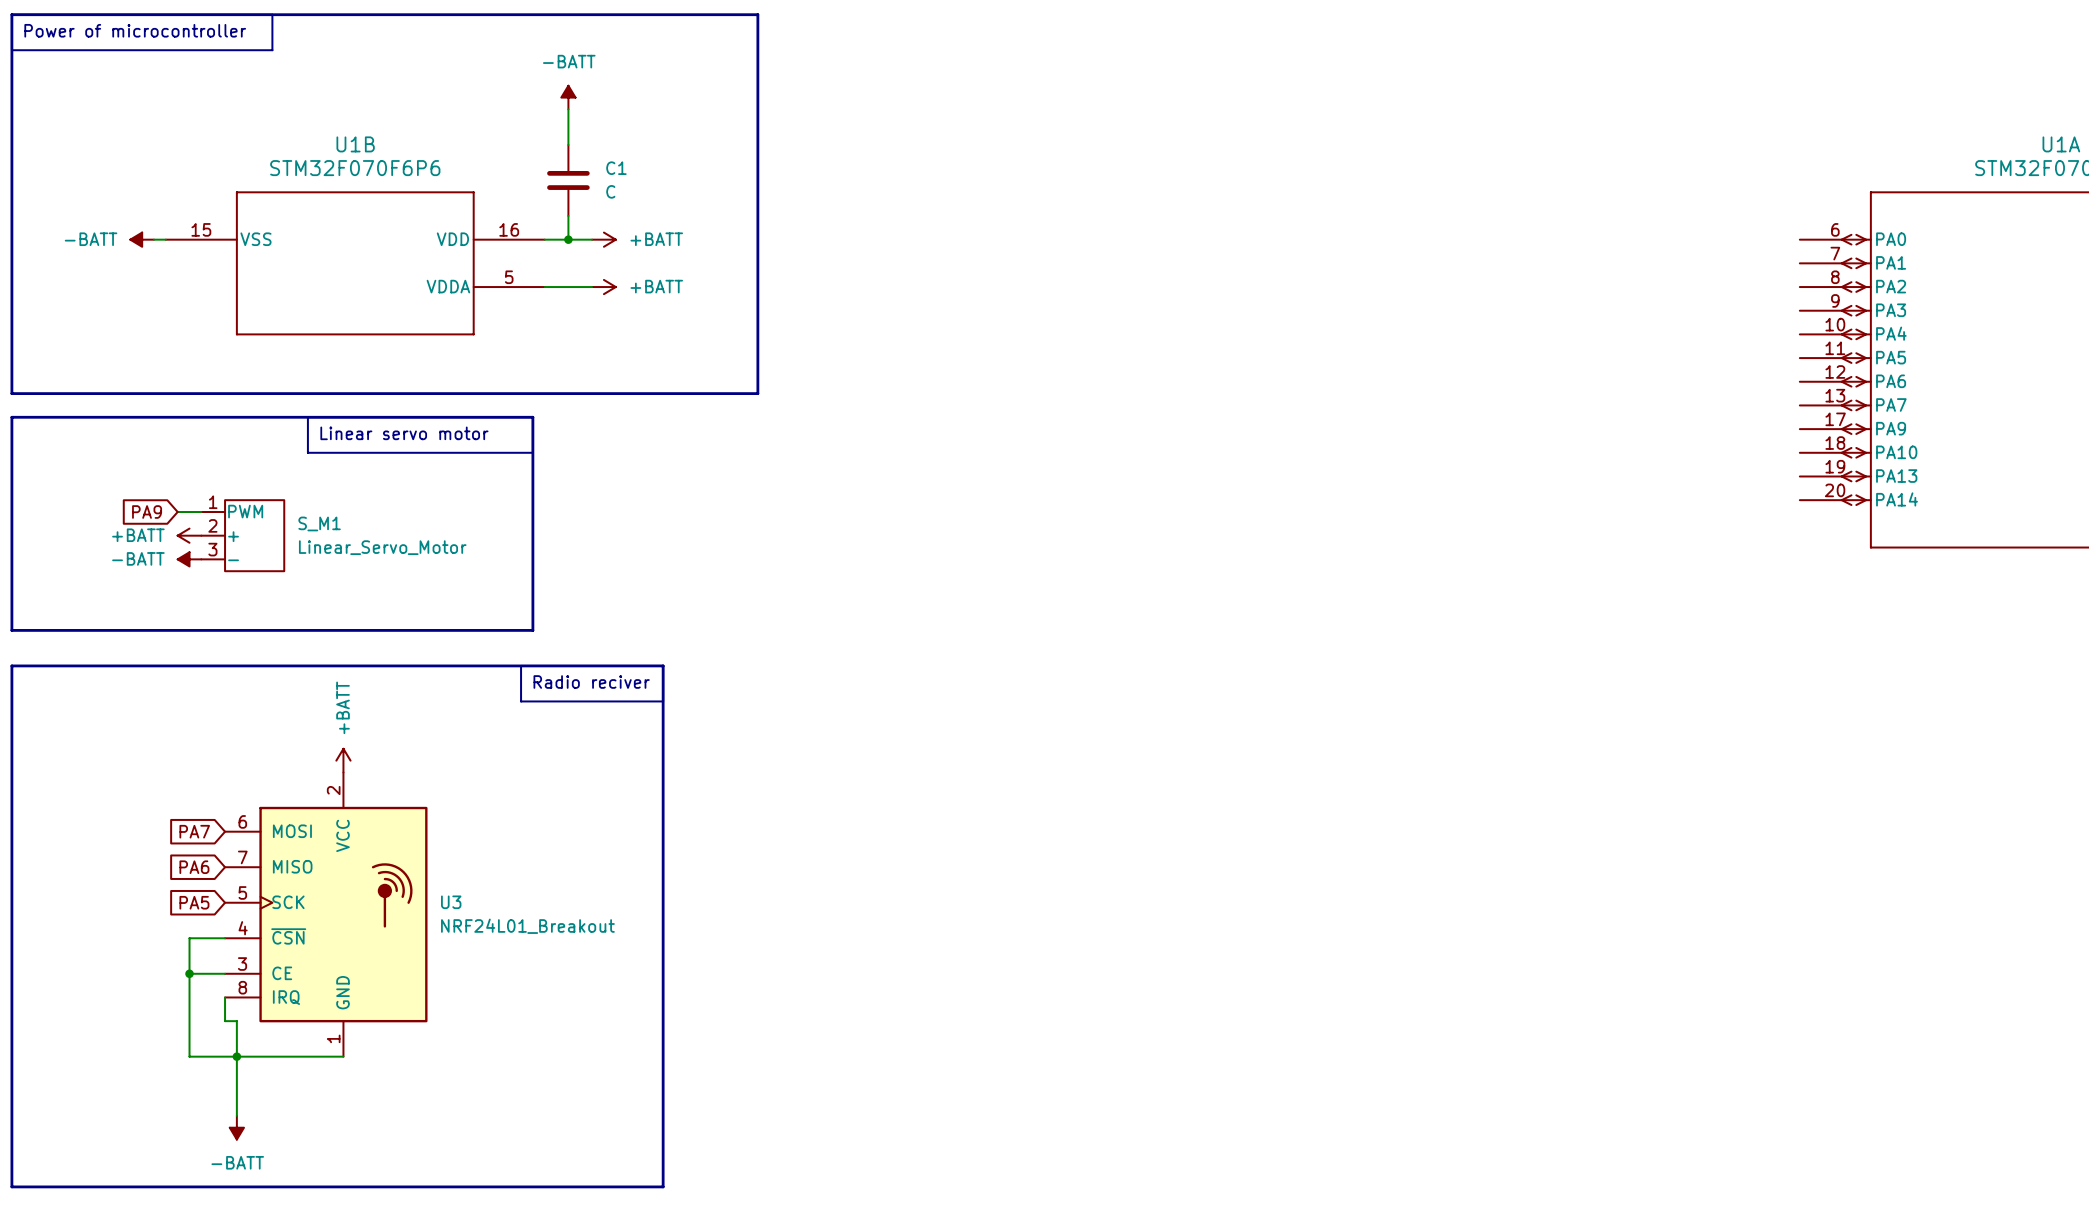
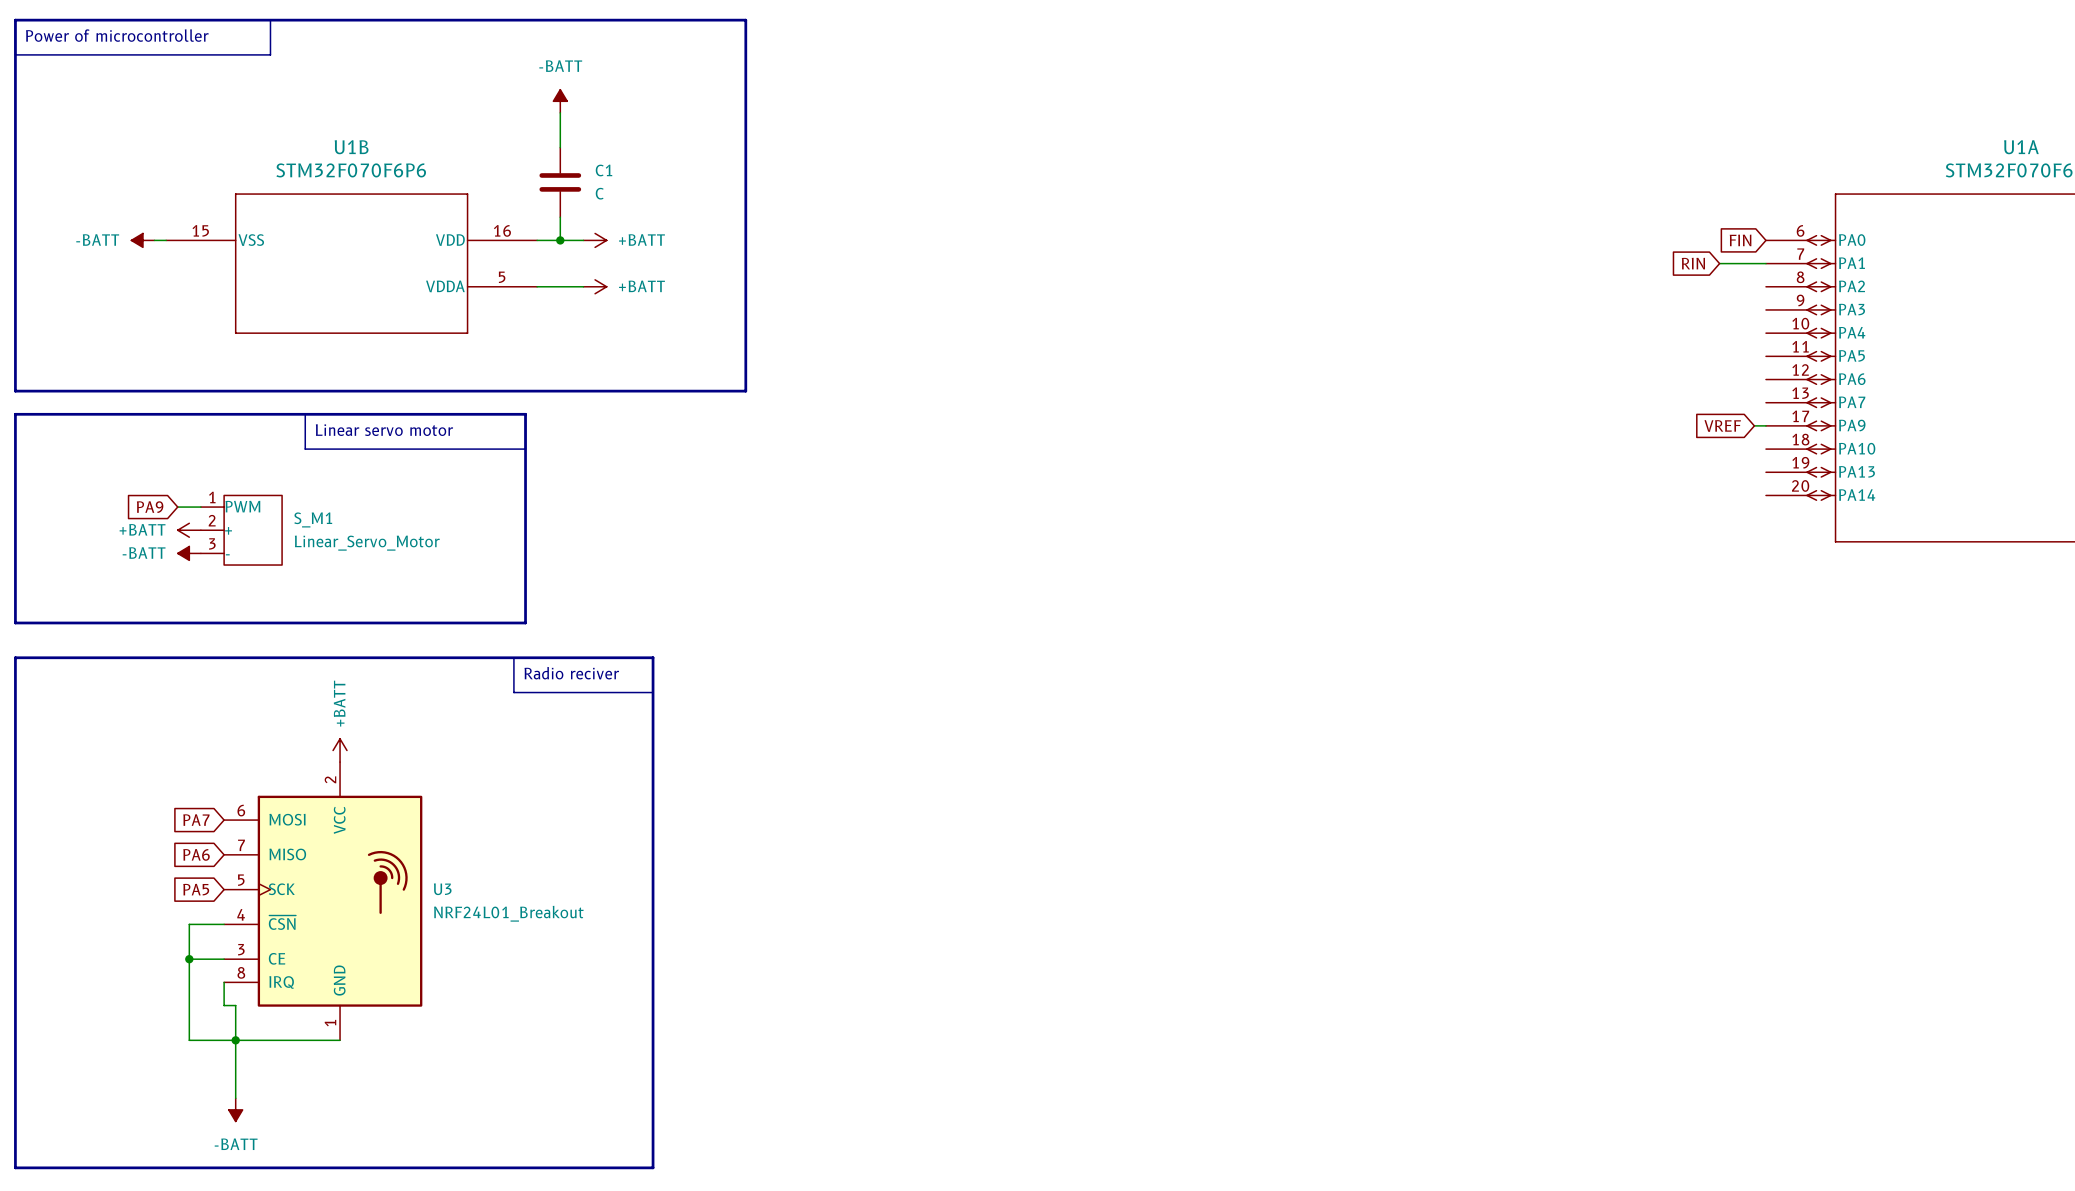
global label: none -> FIN (1740, 240)
global label: none -> RIN (1693, 263)
wire: none -> (1719, 263) (1765, 263)
global label: none -> VREF (1722, 425)
wire: none -> (1754, 425) (1765, 425)

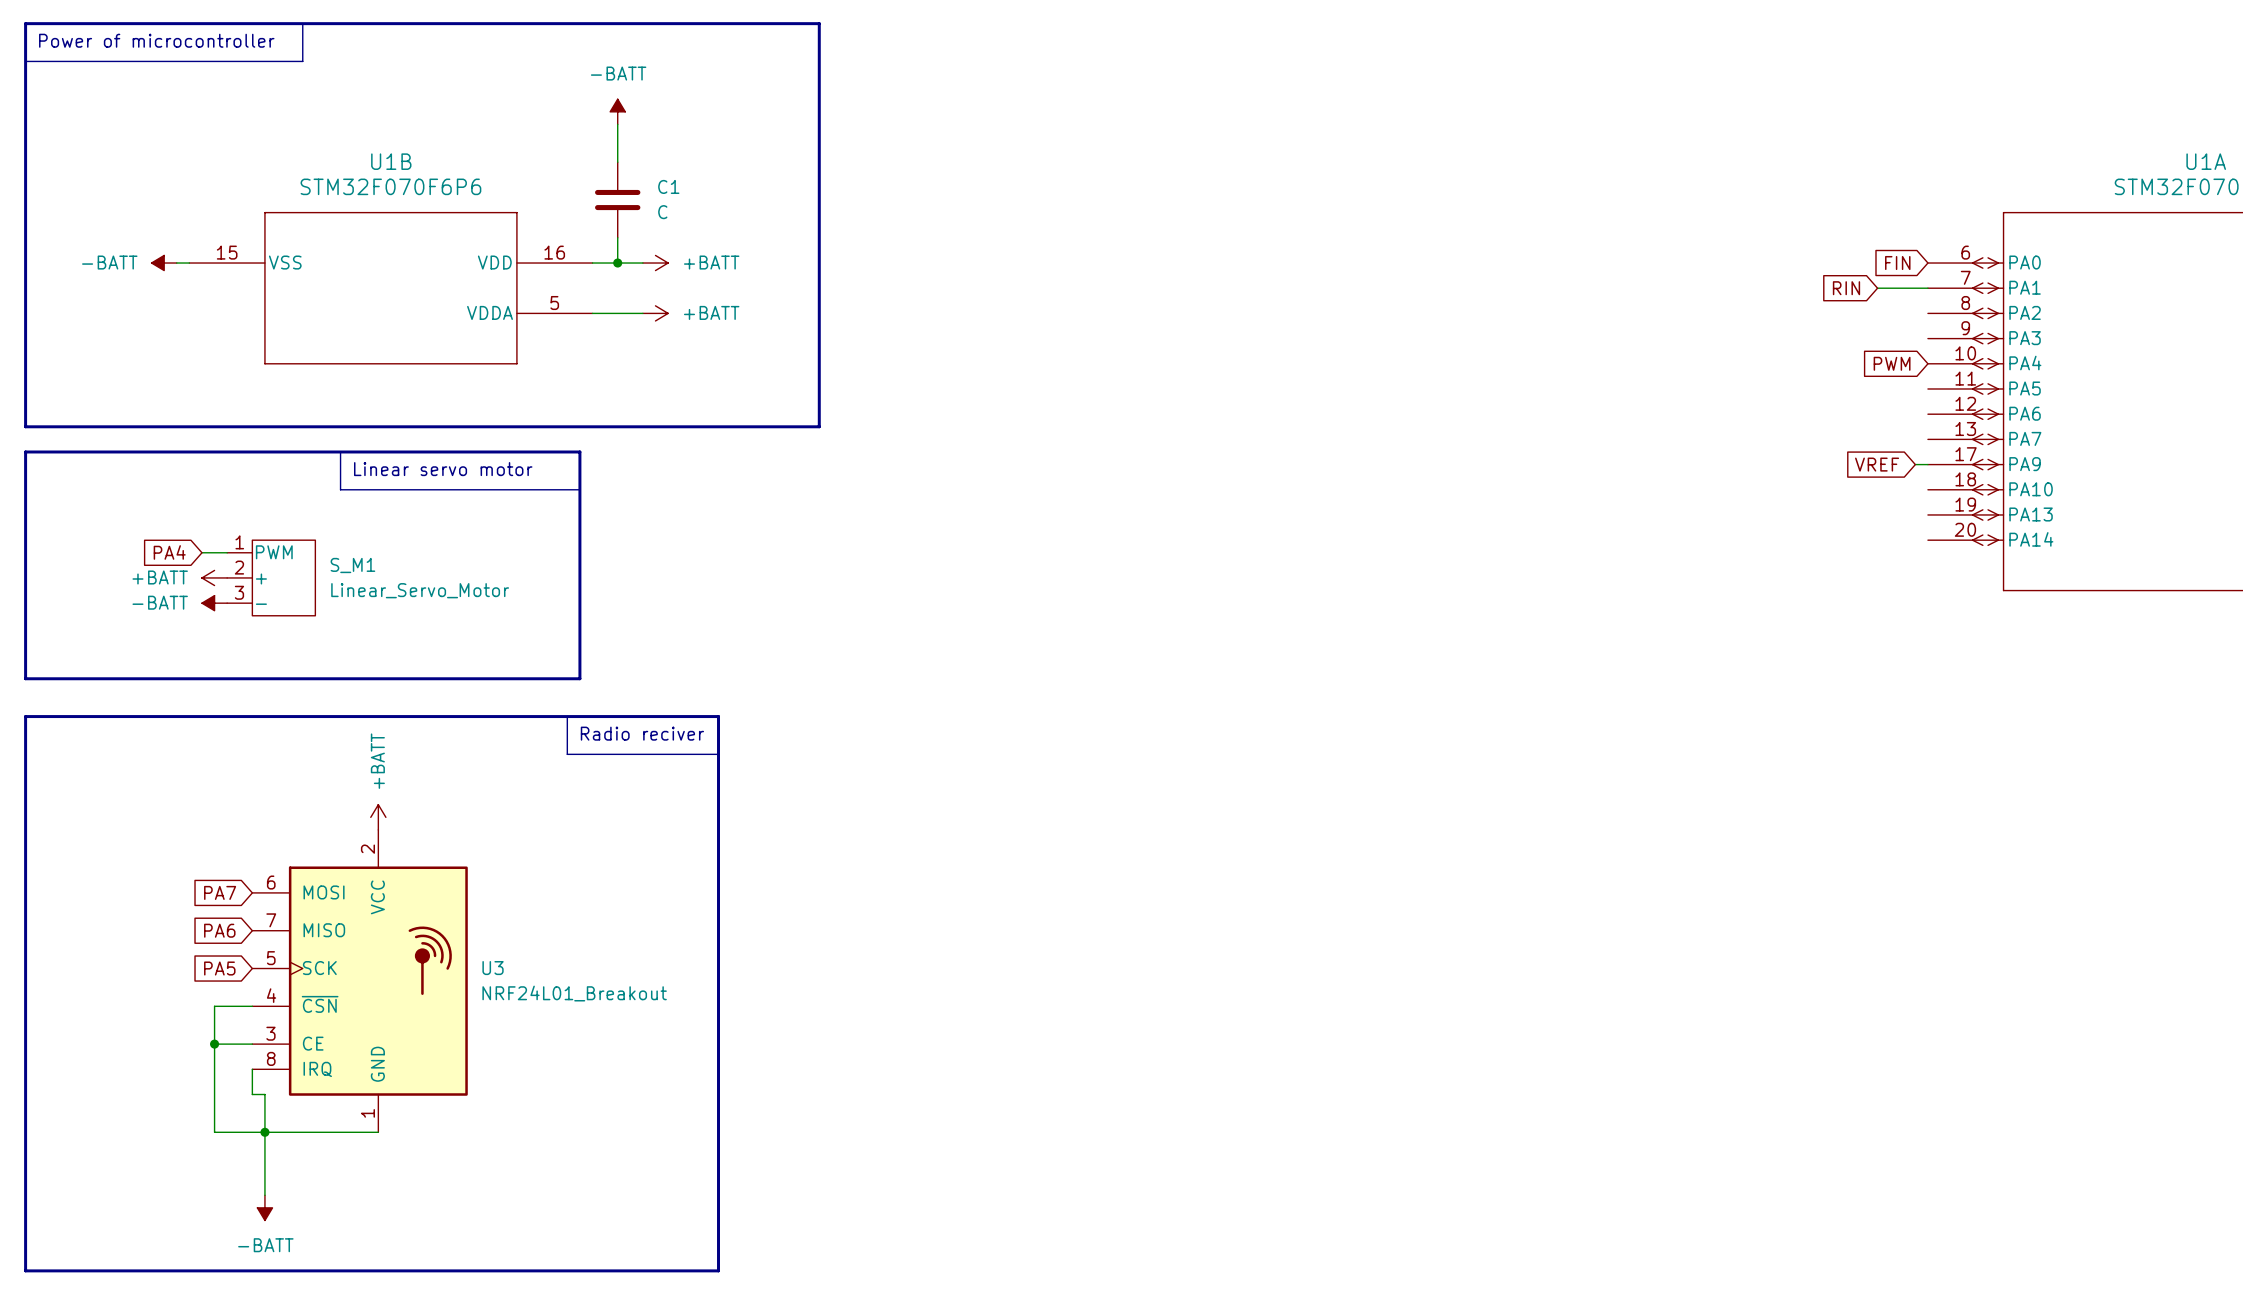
global label: none -> PWM (1892, 363)
global label: PA9 (150, 507) -> PA4 (169, 552)

